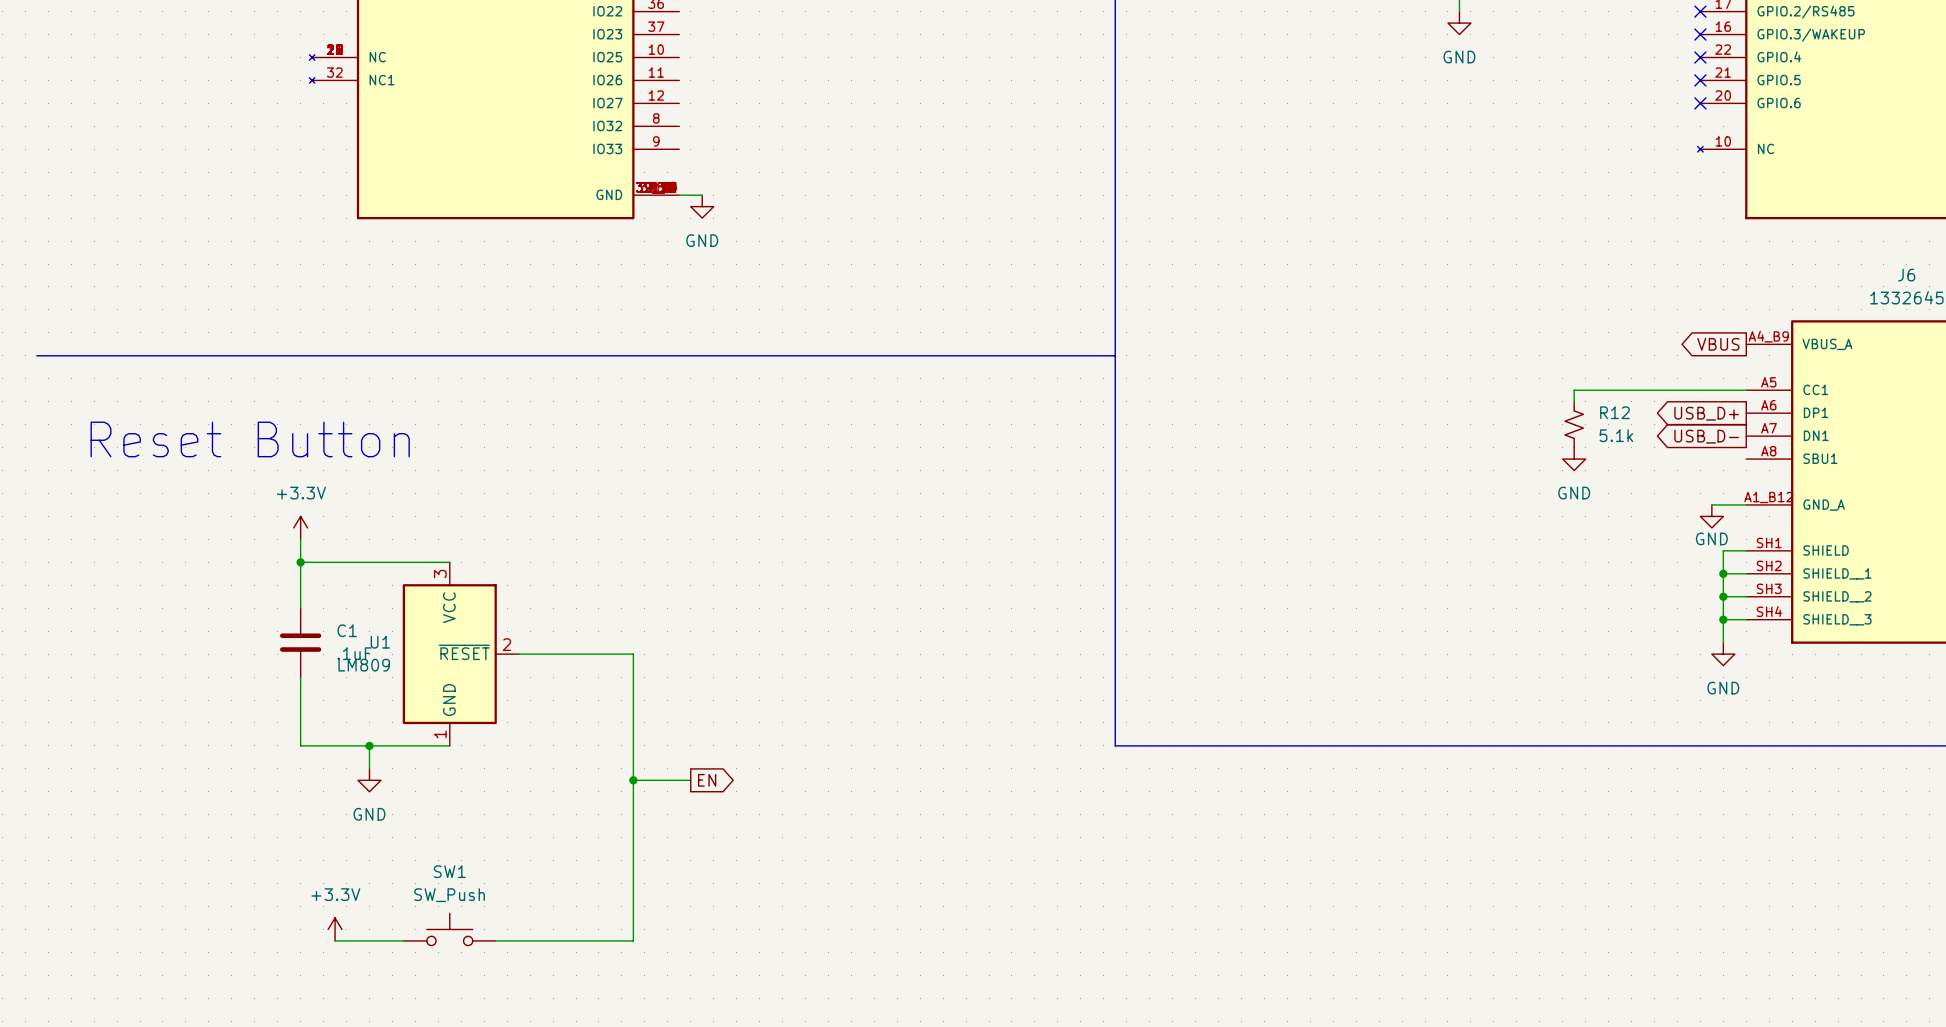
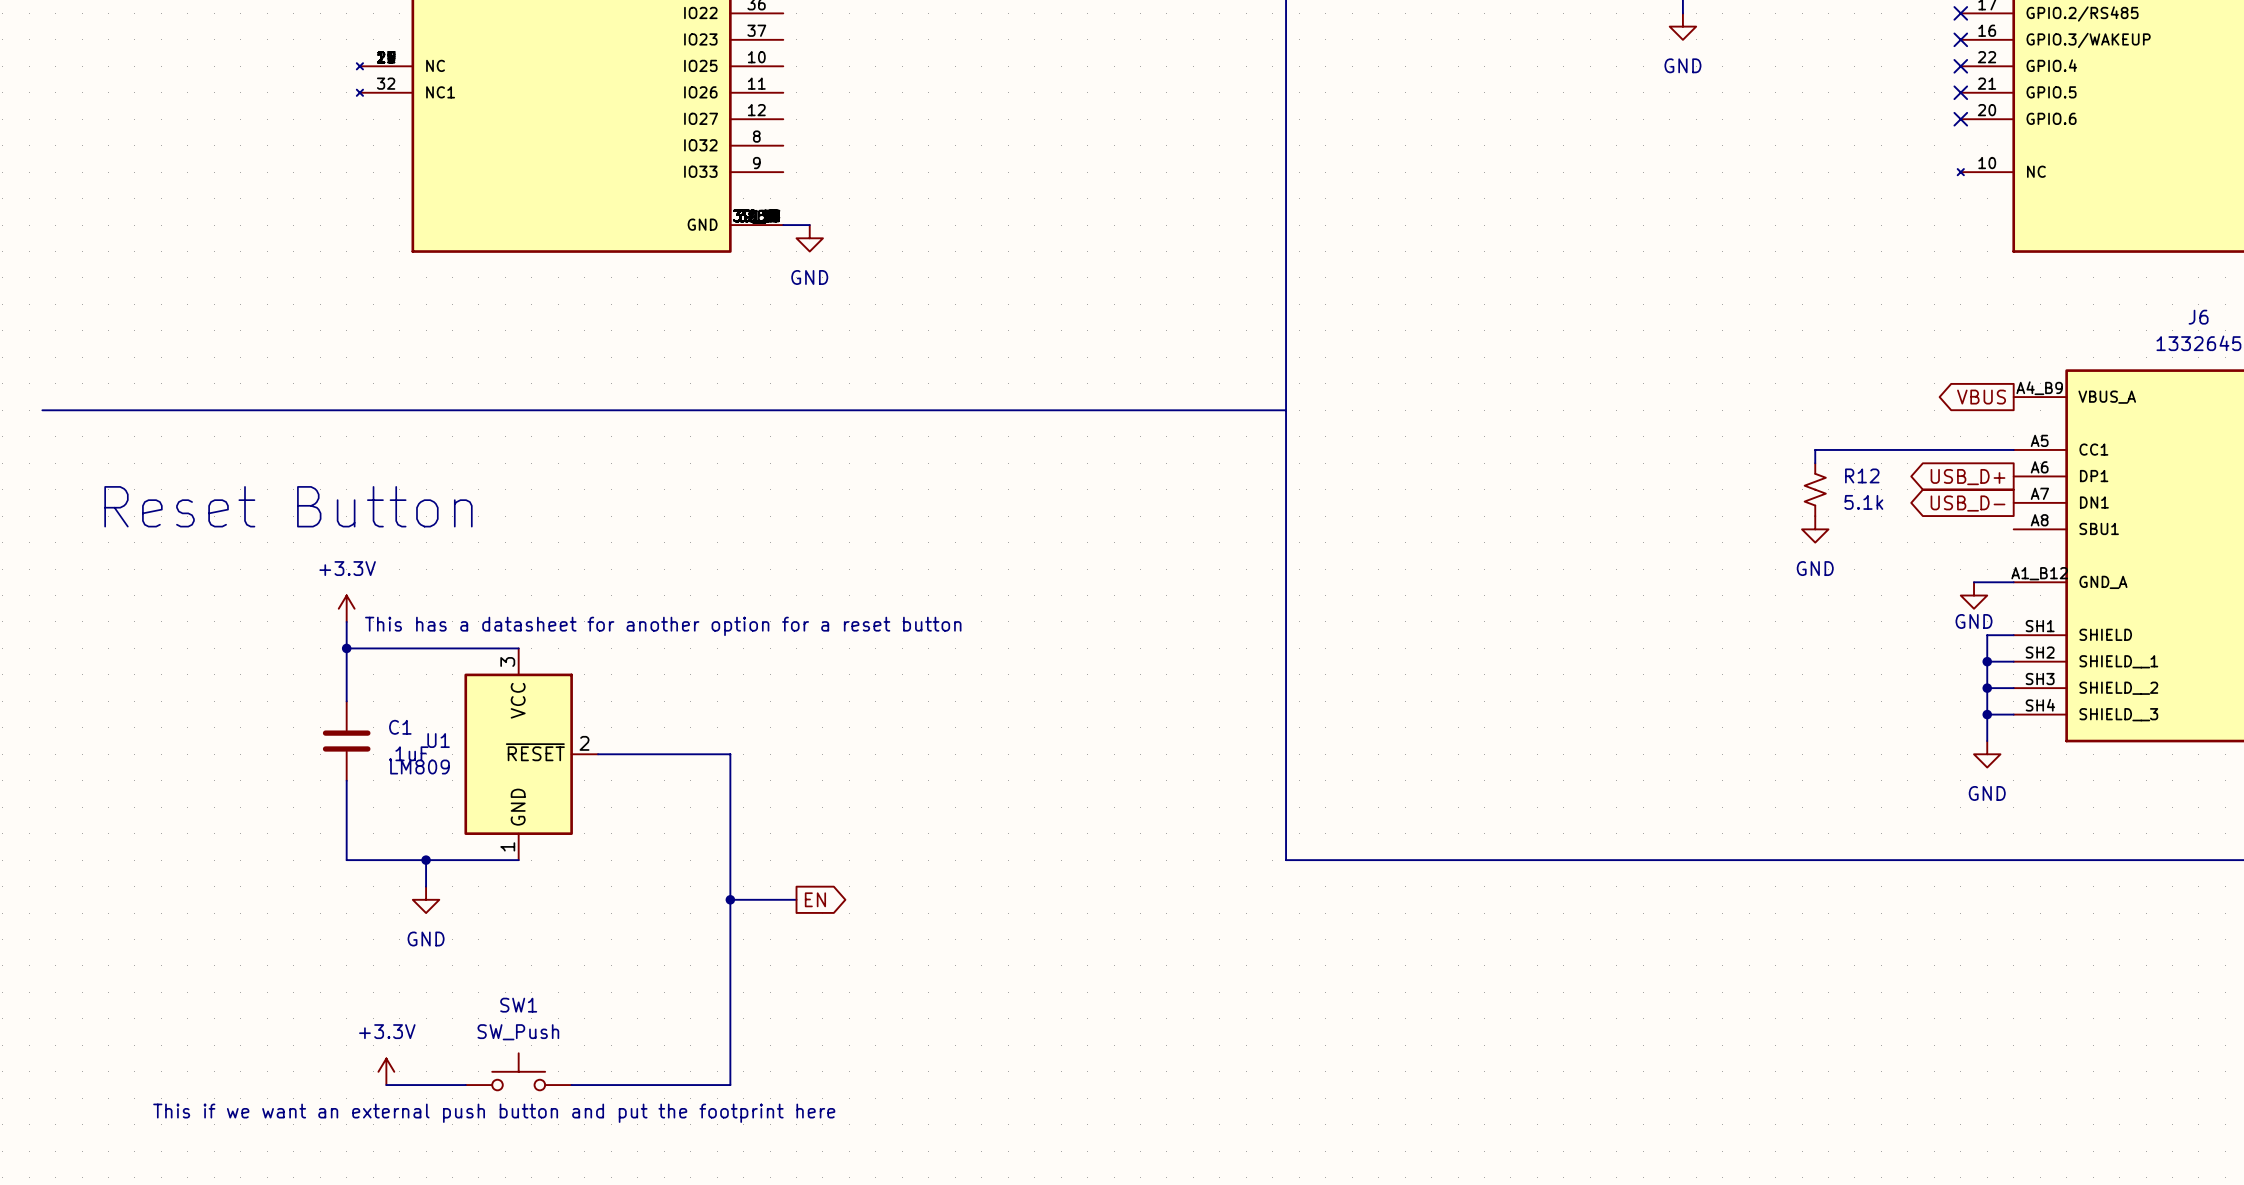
text: none -> This has a datasheet for another option for a reset button (663, 626)
text: none -> This if we want an external push button and put the footprint here (494, 1113)

